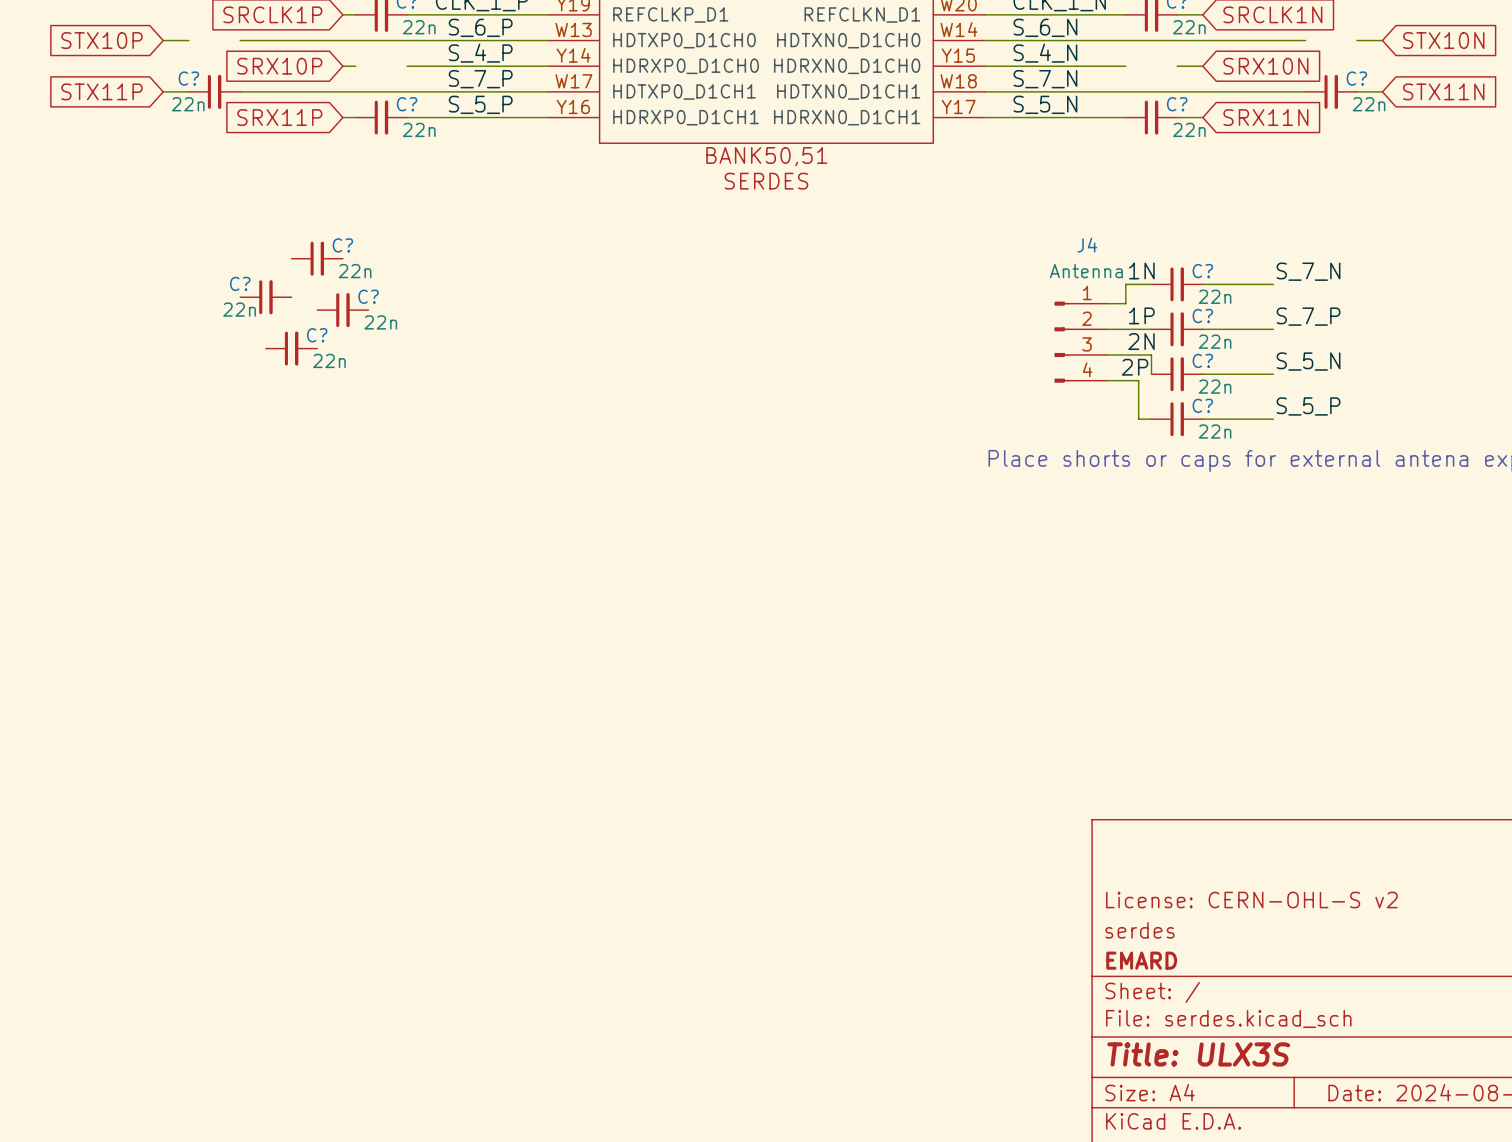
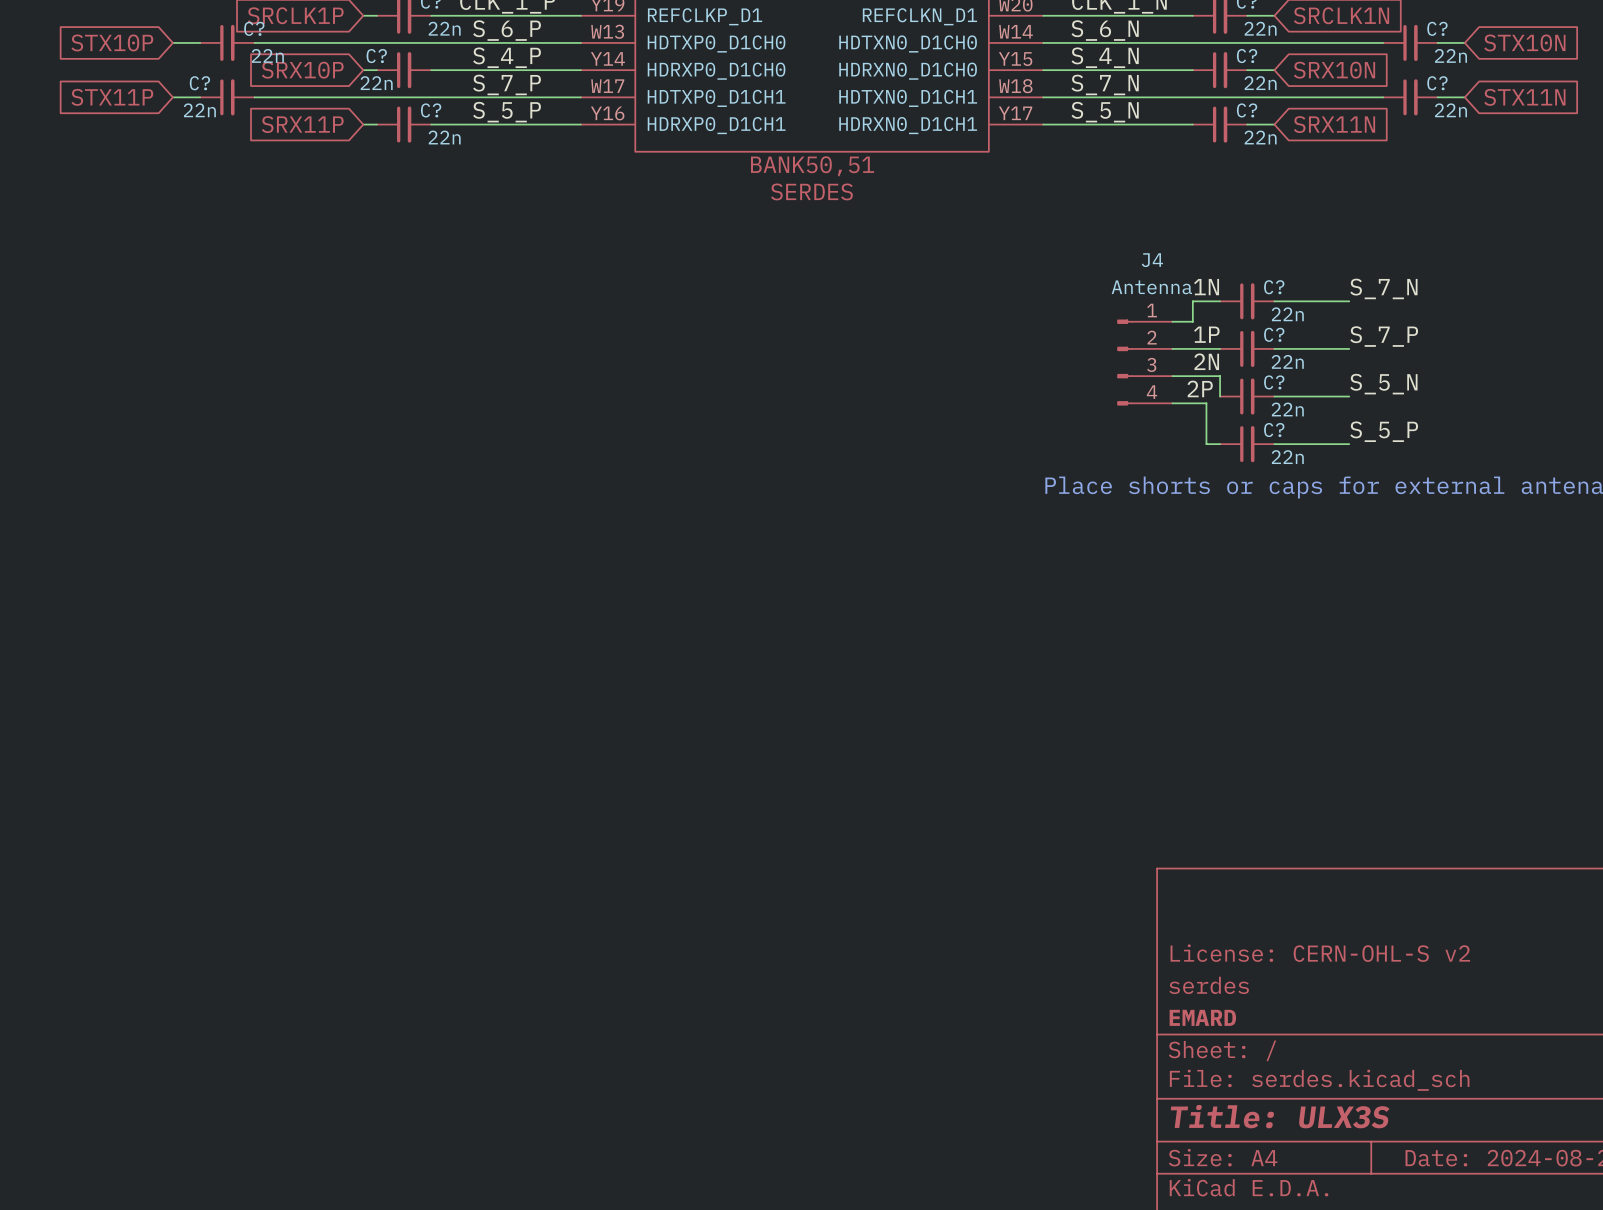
C?: none -> 22n (227, 42)
C?: none -> 22n (1410, 42)
C?: none -> 22n (404, 70)
C?: none -> 22n (1220, 70)
C?: 22n (317, 258) -> none
C?: 22n (265, 297) -> none
C?: 22n (342, 310) -> none
C?: 22n (291, 348) -> none

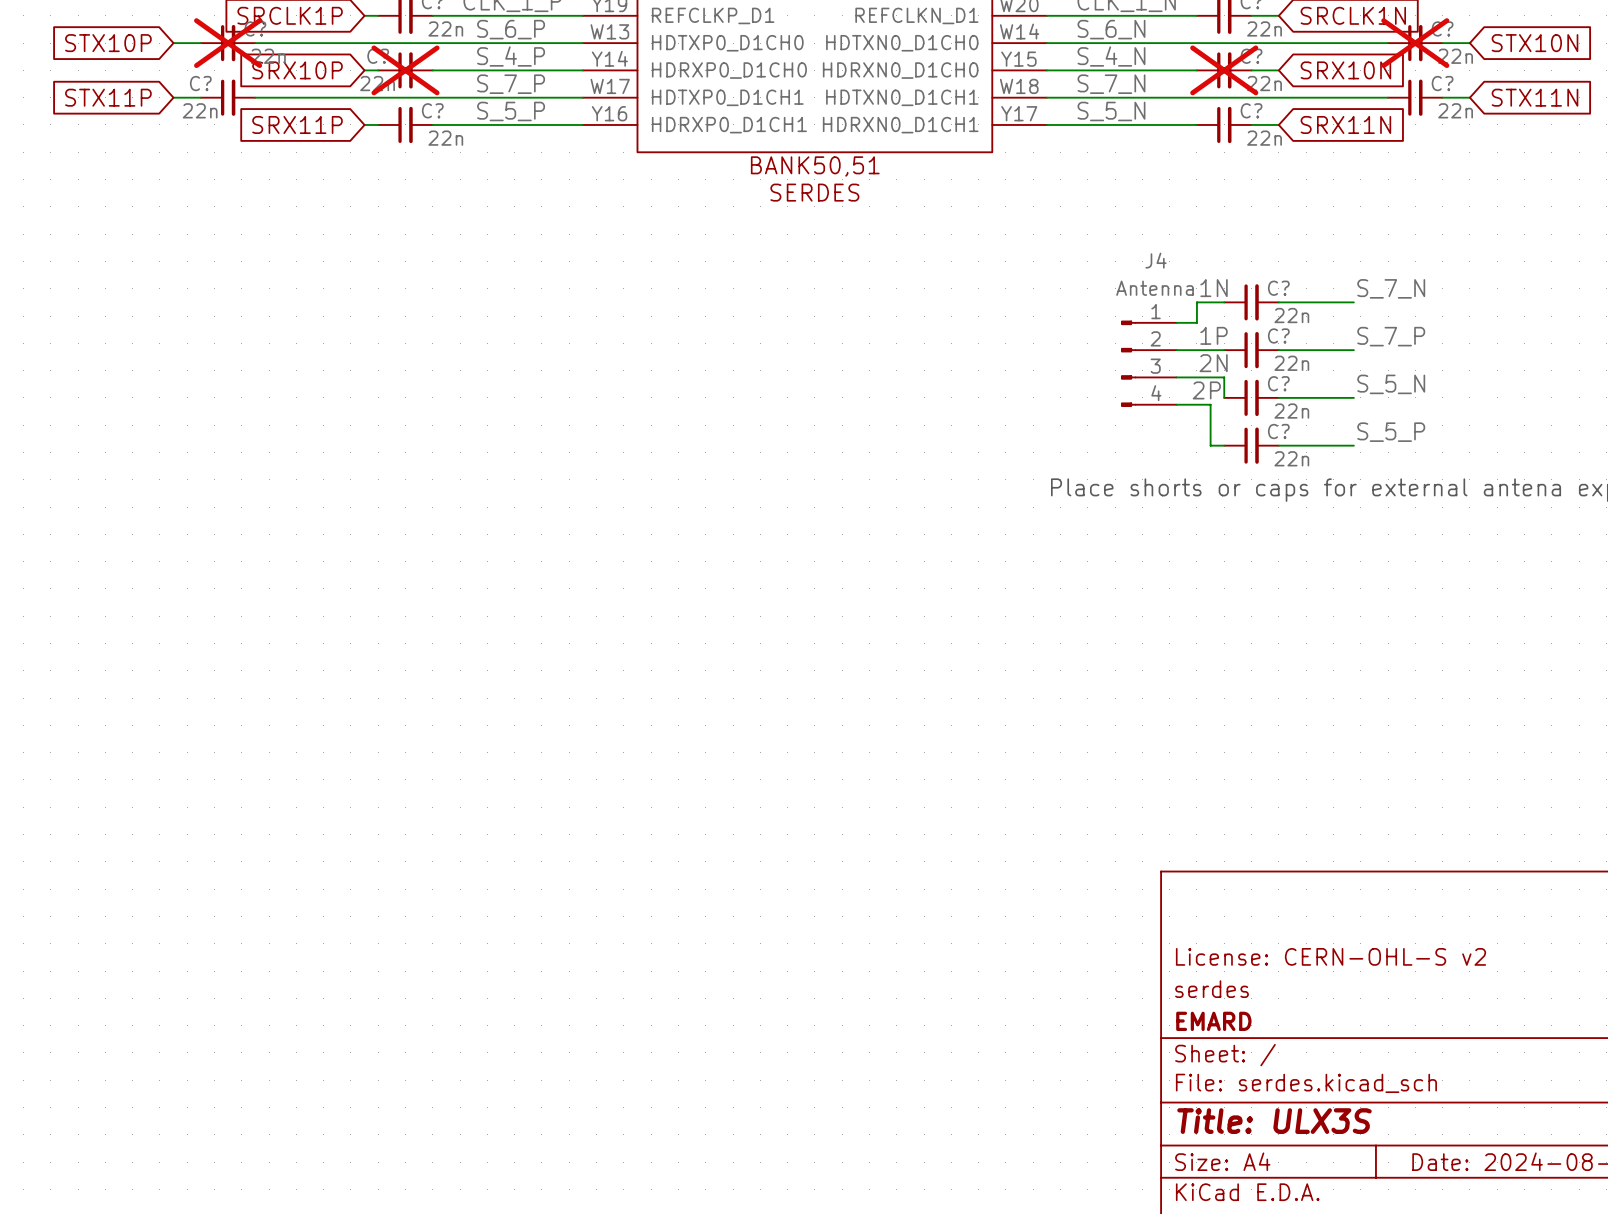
C? do-not-place cross: none -> (228, 43)
C? do-not-place cross: none -> (1415, 43)
C? do-not-place cross: none -> (405, 70)
C? do-not-place cross: none -> (1224, 70)

